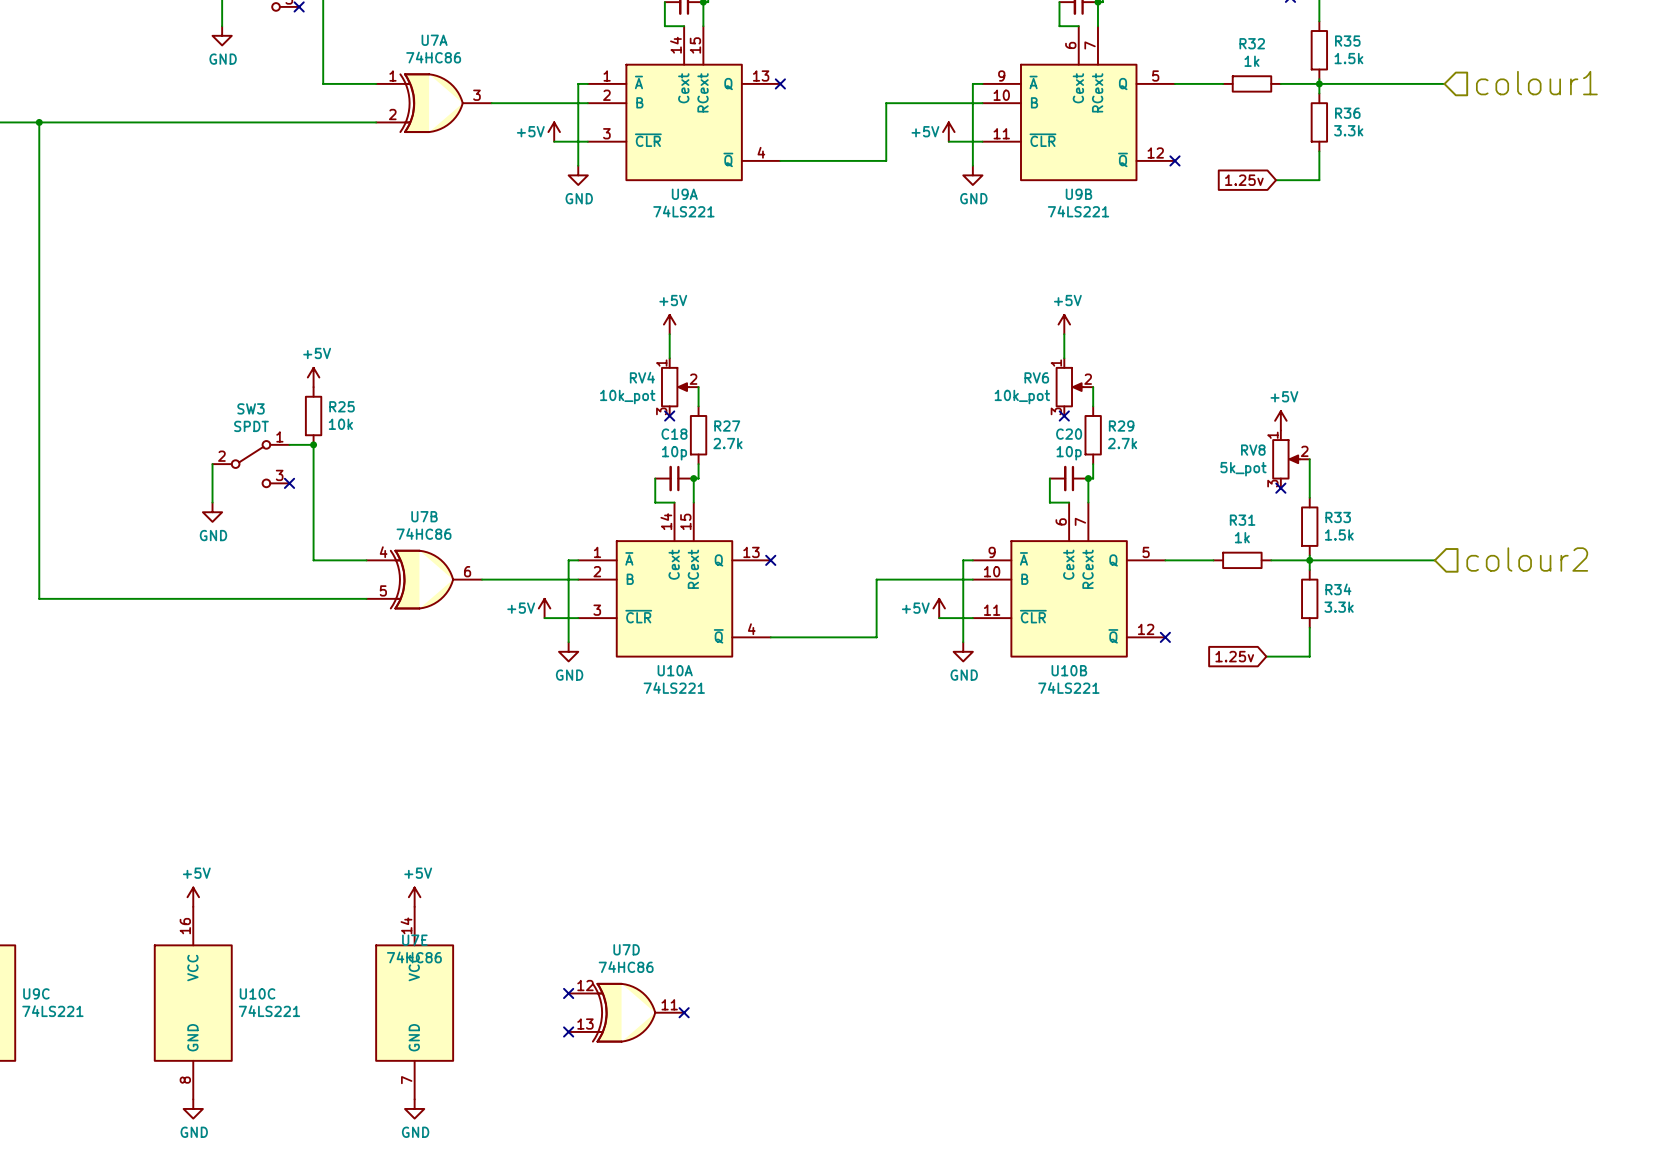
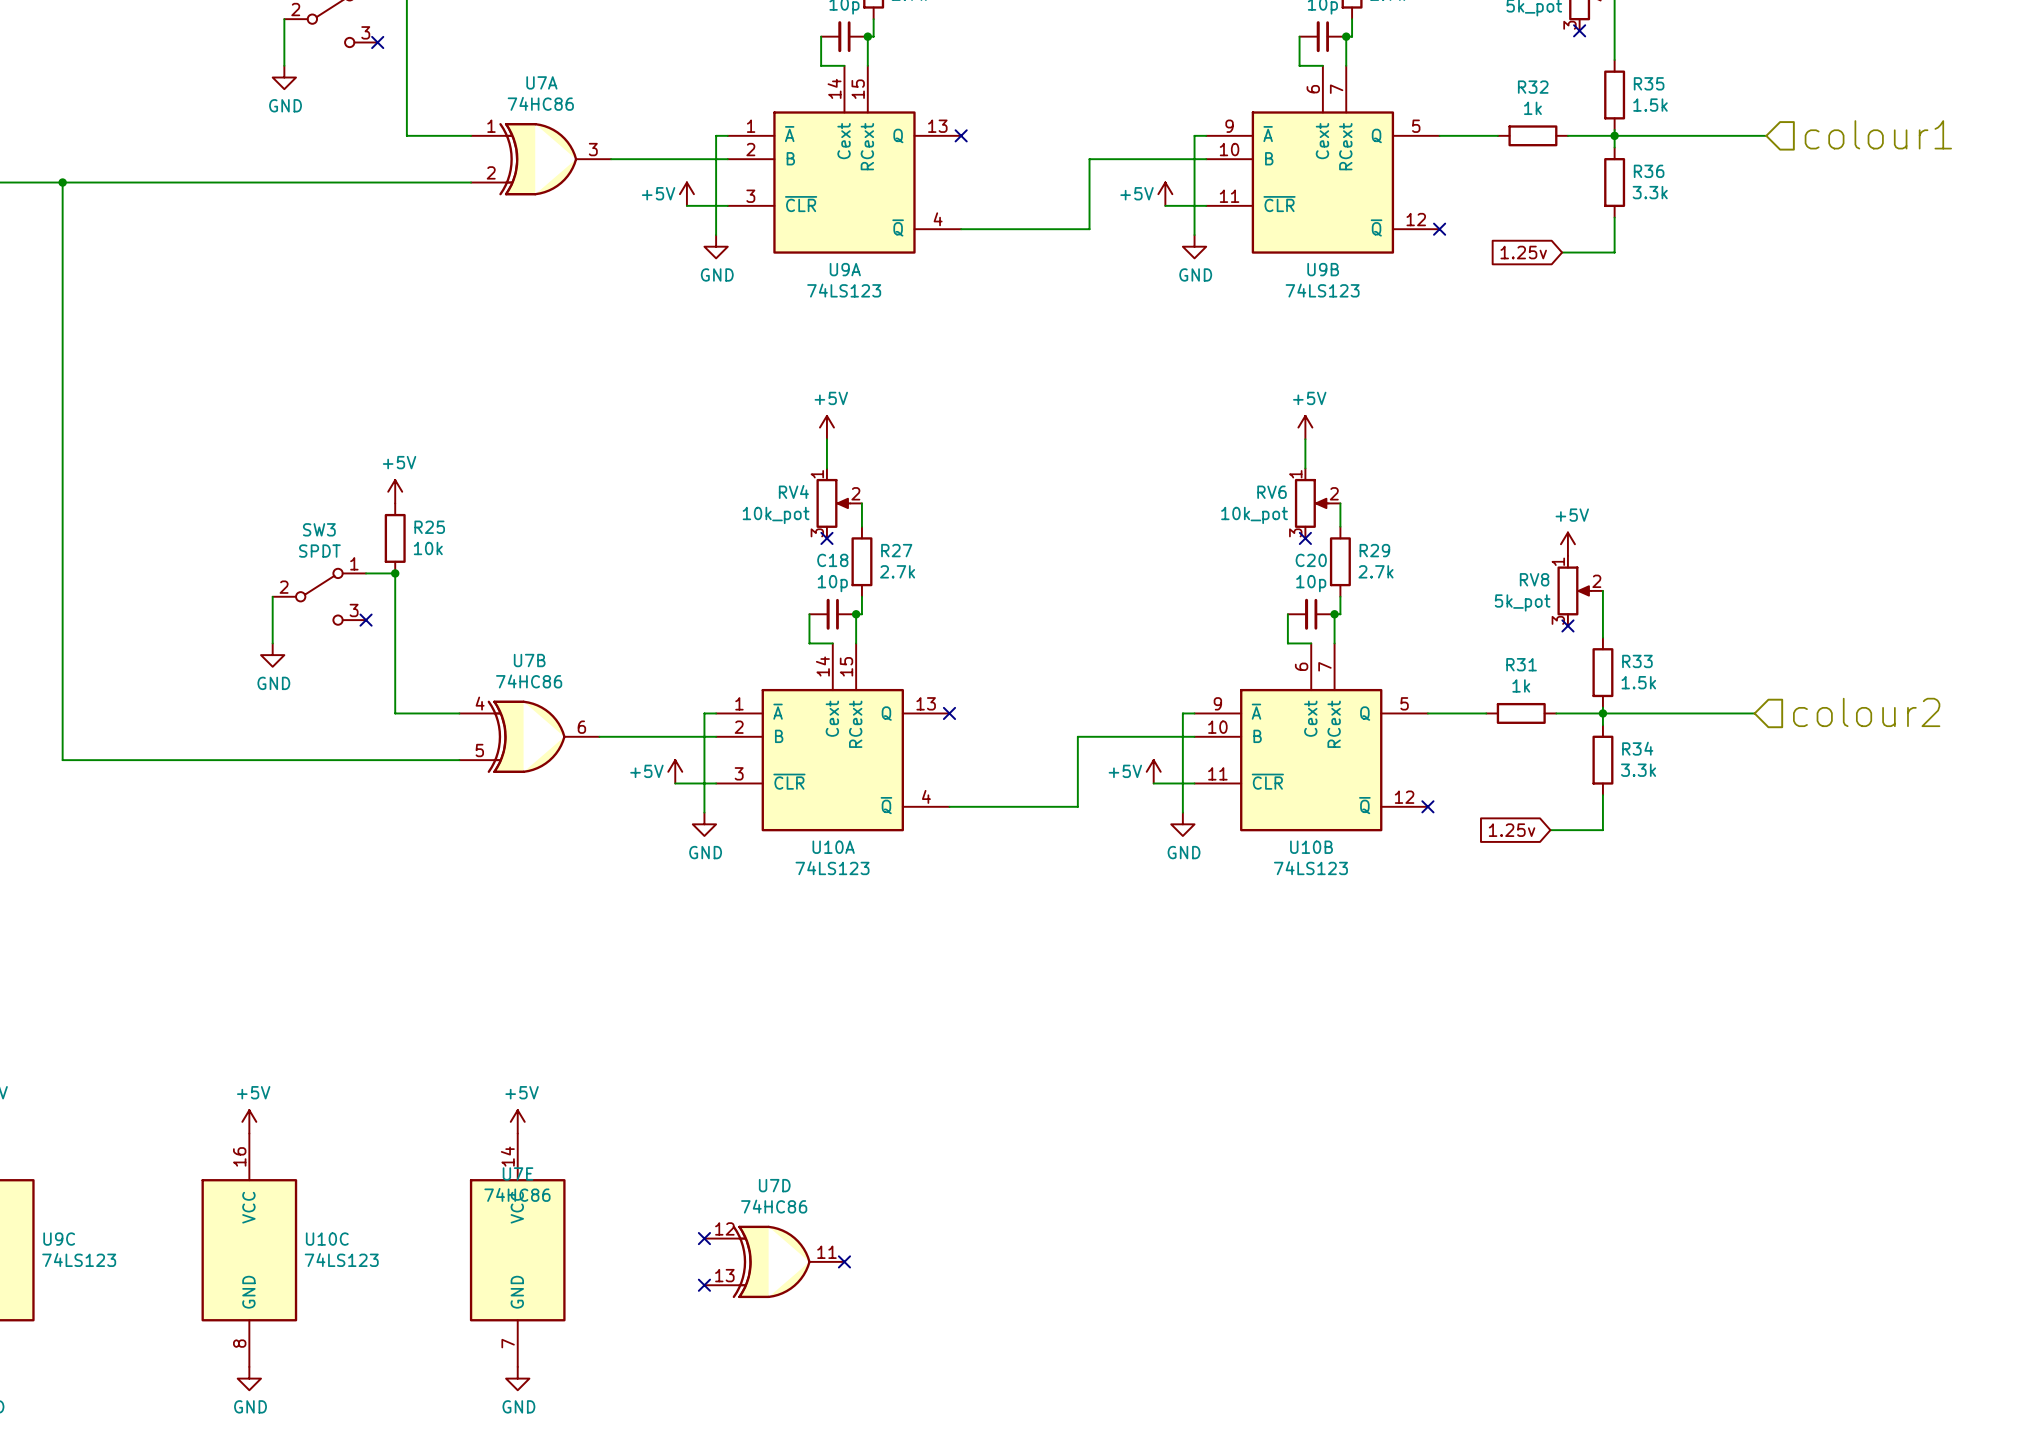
U9A value: 74LS221 (683, 211) -> 74LS123 (844, 290)
U9B value: 74LS221 (1078, 211) -> 74LS123 (1322, 290)
U10A value: 74LS221 (674, 687) -> 74LS123 (832, 868)
U10B value: 74LS221 (1068, 687) -> 74LS123 (1310, 868)
U9C value: 74LS221 (52, 1011) -> 74LS123 (79, 1260)
U10C value: 74LS221 (269, 1011) -> 74LS123 (341, 1260)

